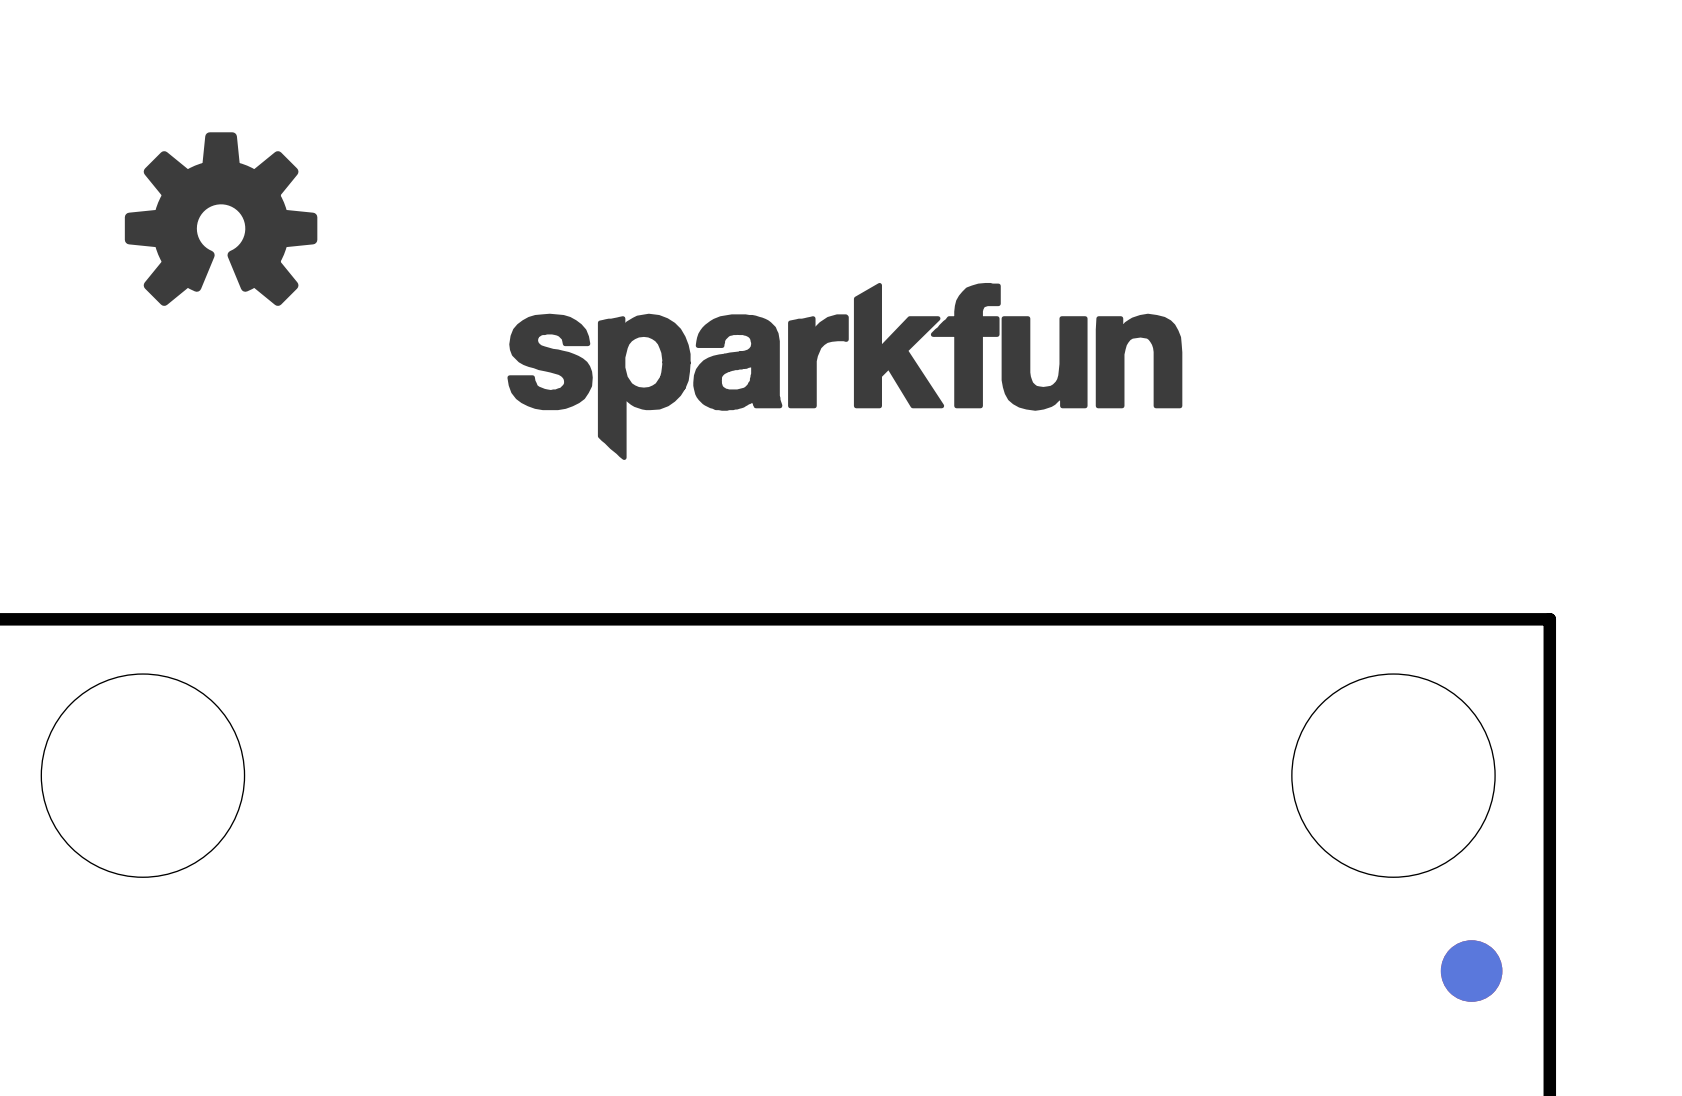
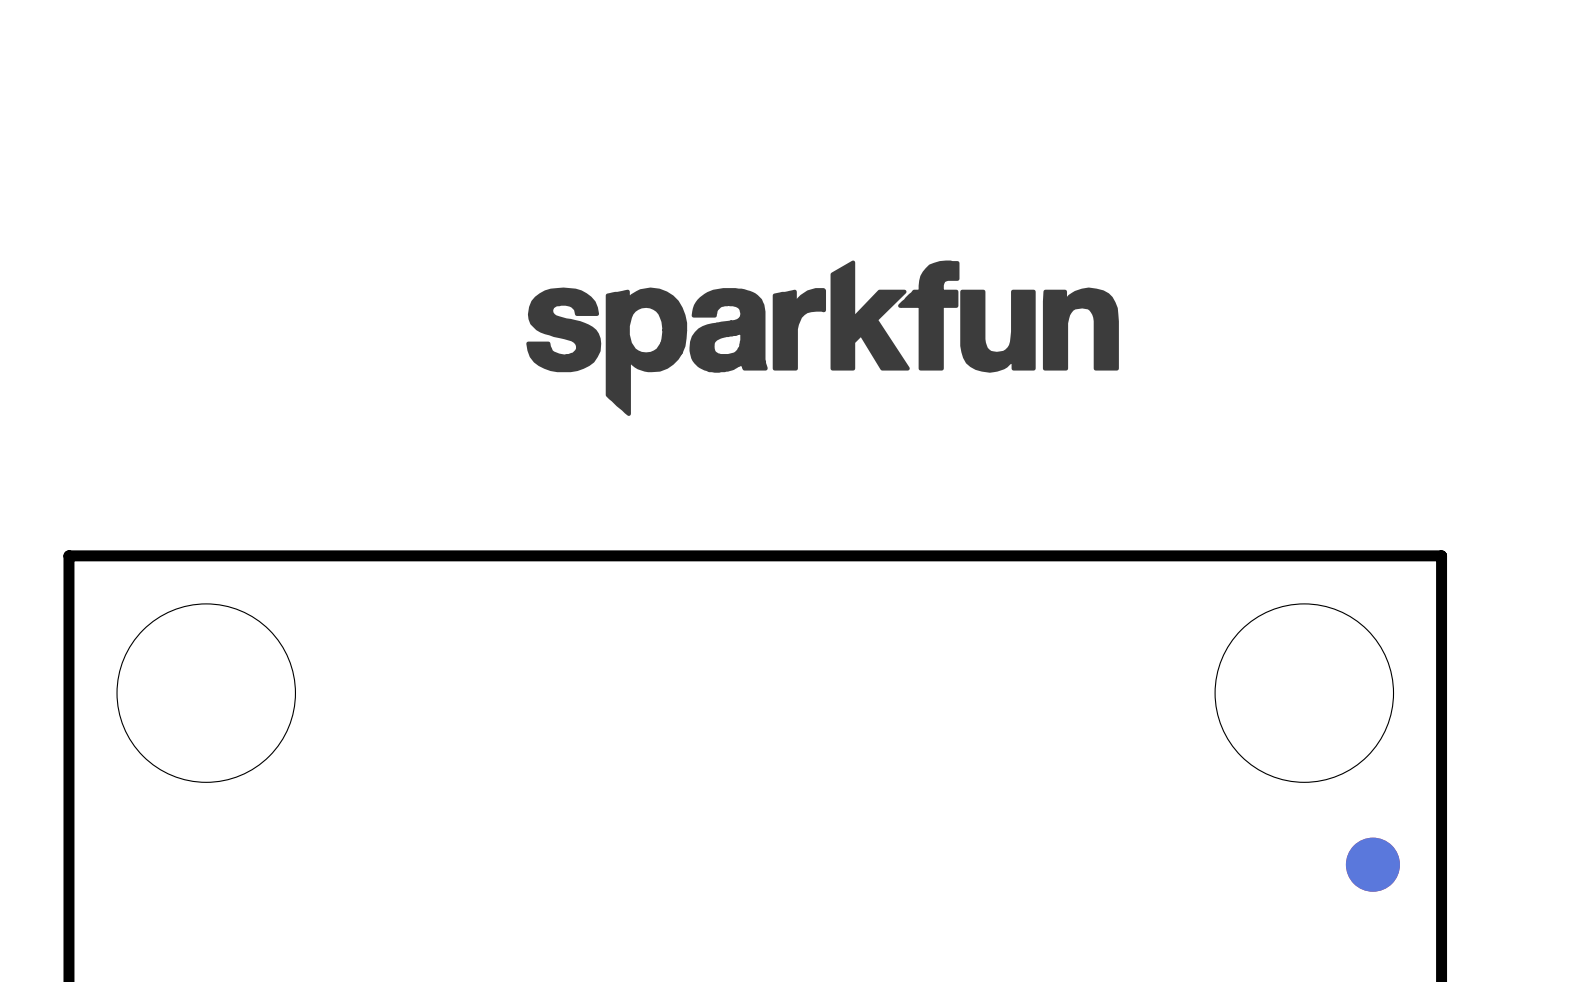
drawing: [124, 132, 318, 306] -> none

